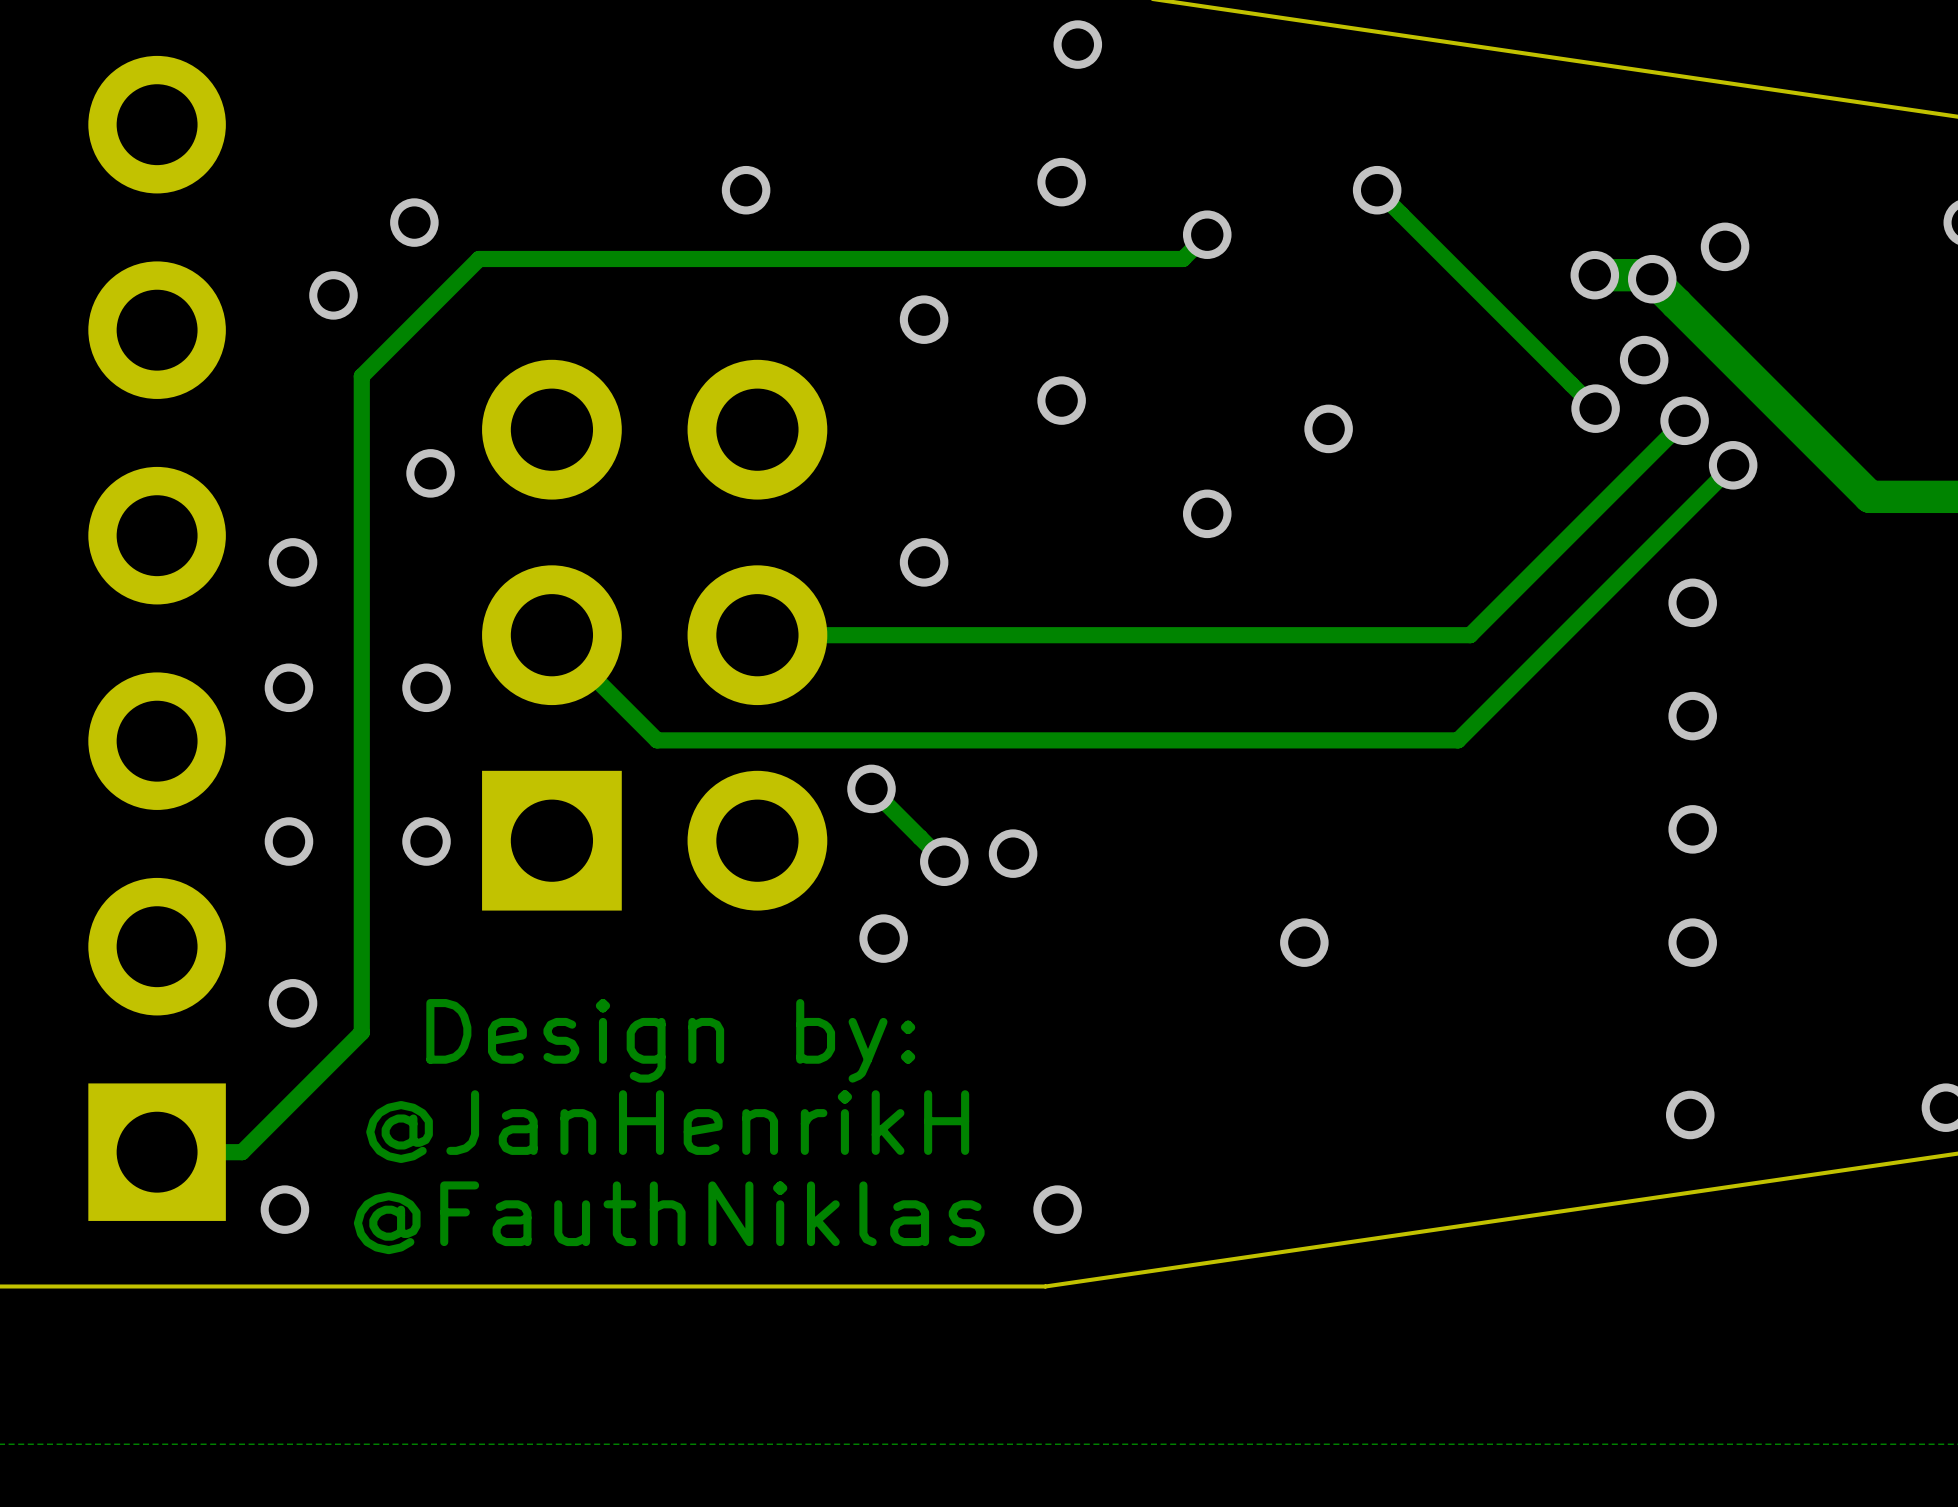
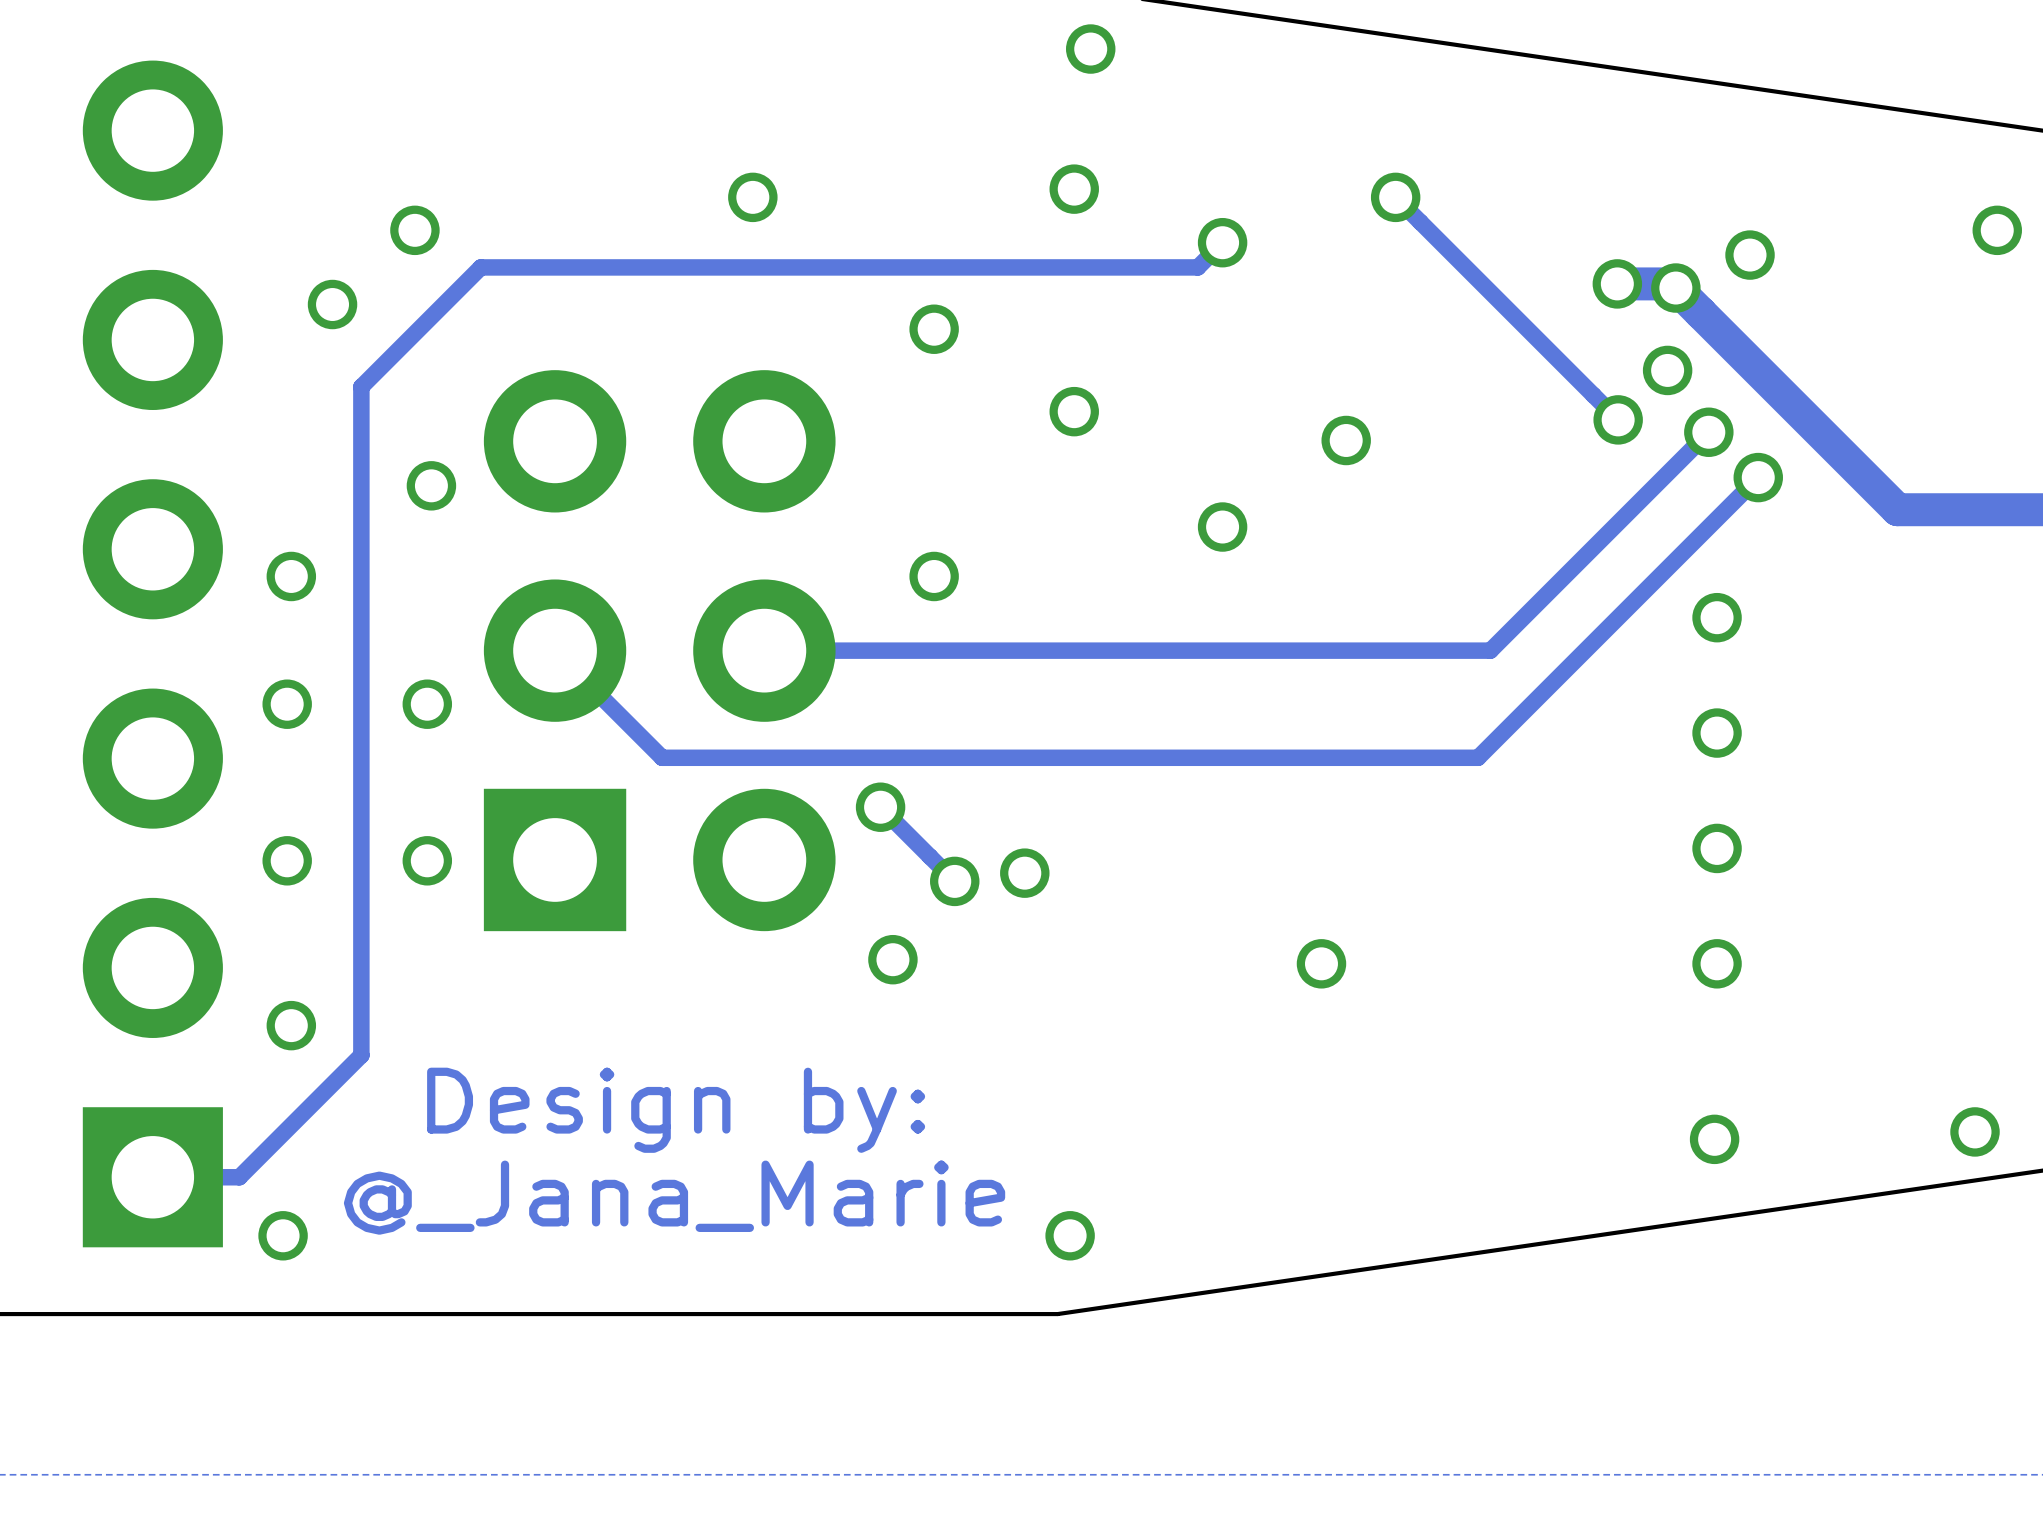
text position: Design by: (670, 1040) -> Design by: (676, 1110)
text: @JanHenrikH (667, 1126) -> none
text: none -> @_Jana_Marie (674, 1197)
text: @FauthNiklas (669, 1217) -> none

